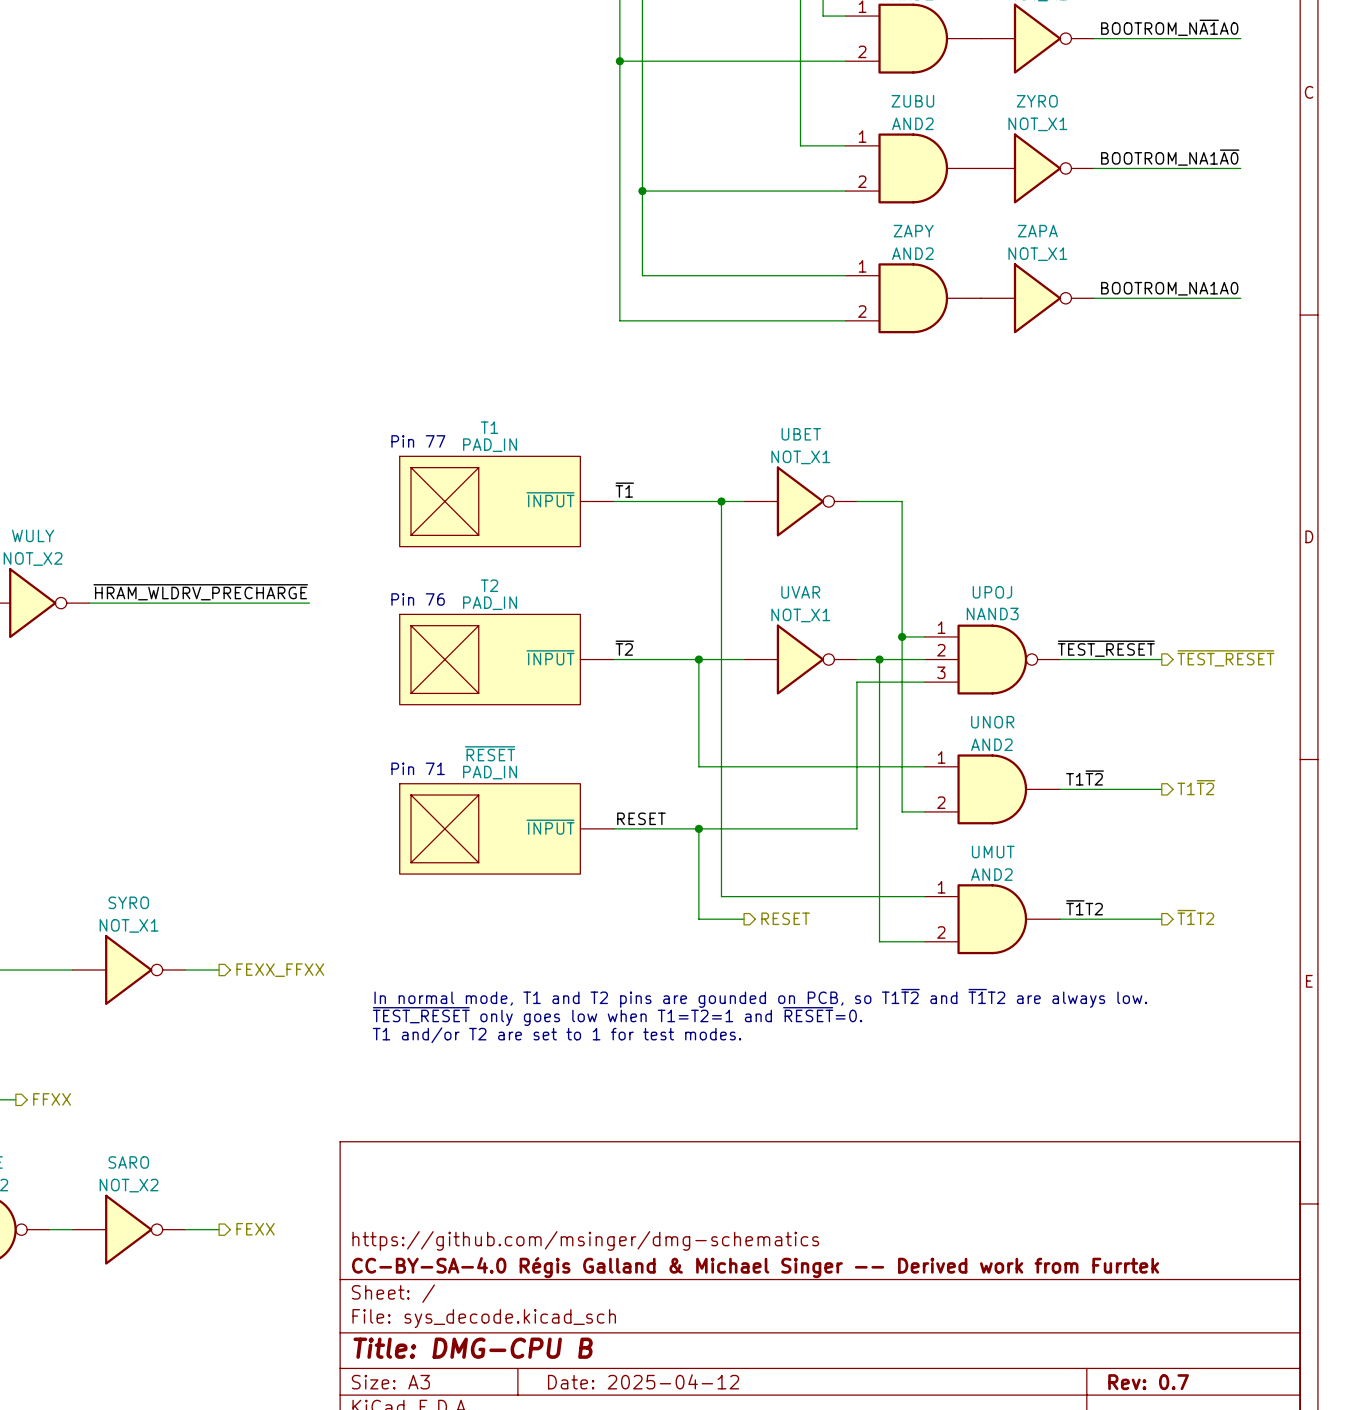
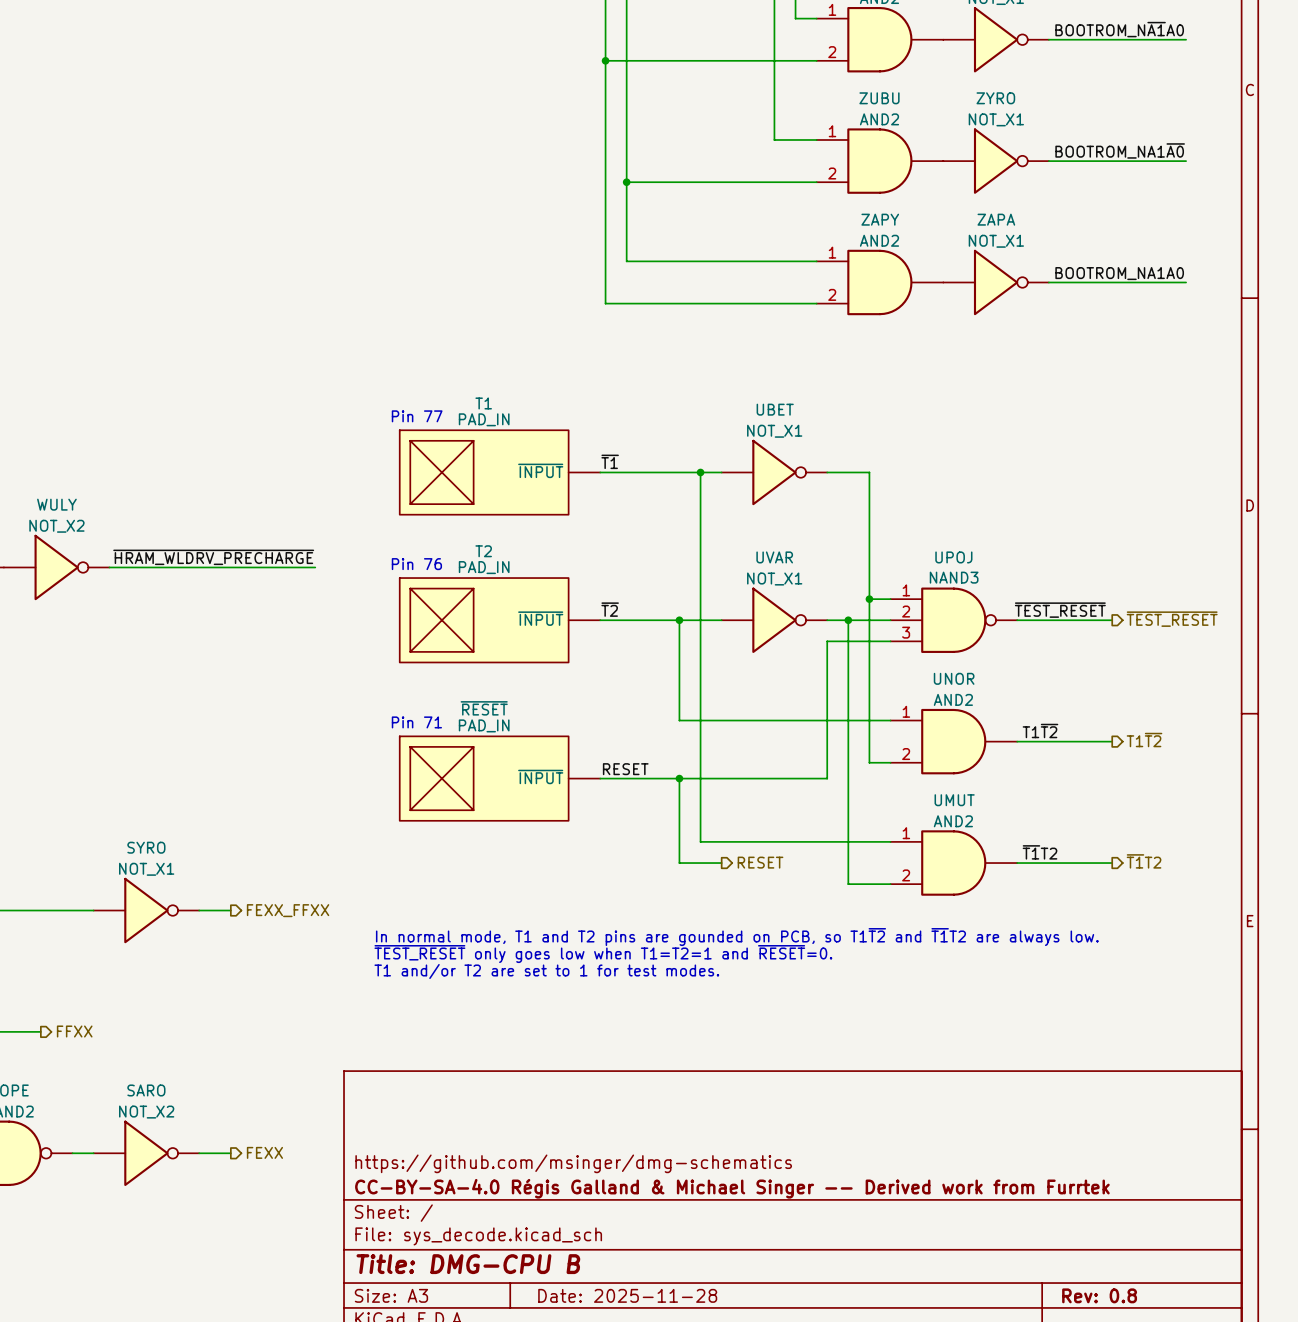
title block: Date: 2025-04-12 (643, 1381) -> Date: 2025-11-28 (627, 1295)
title block: Rev: 0.7 (1148, 1382) -> Rev: 0.8 (1099, 1295)

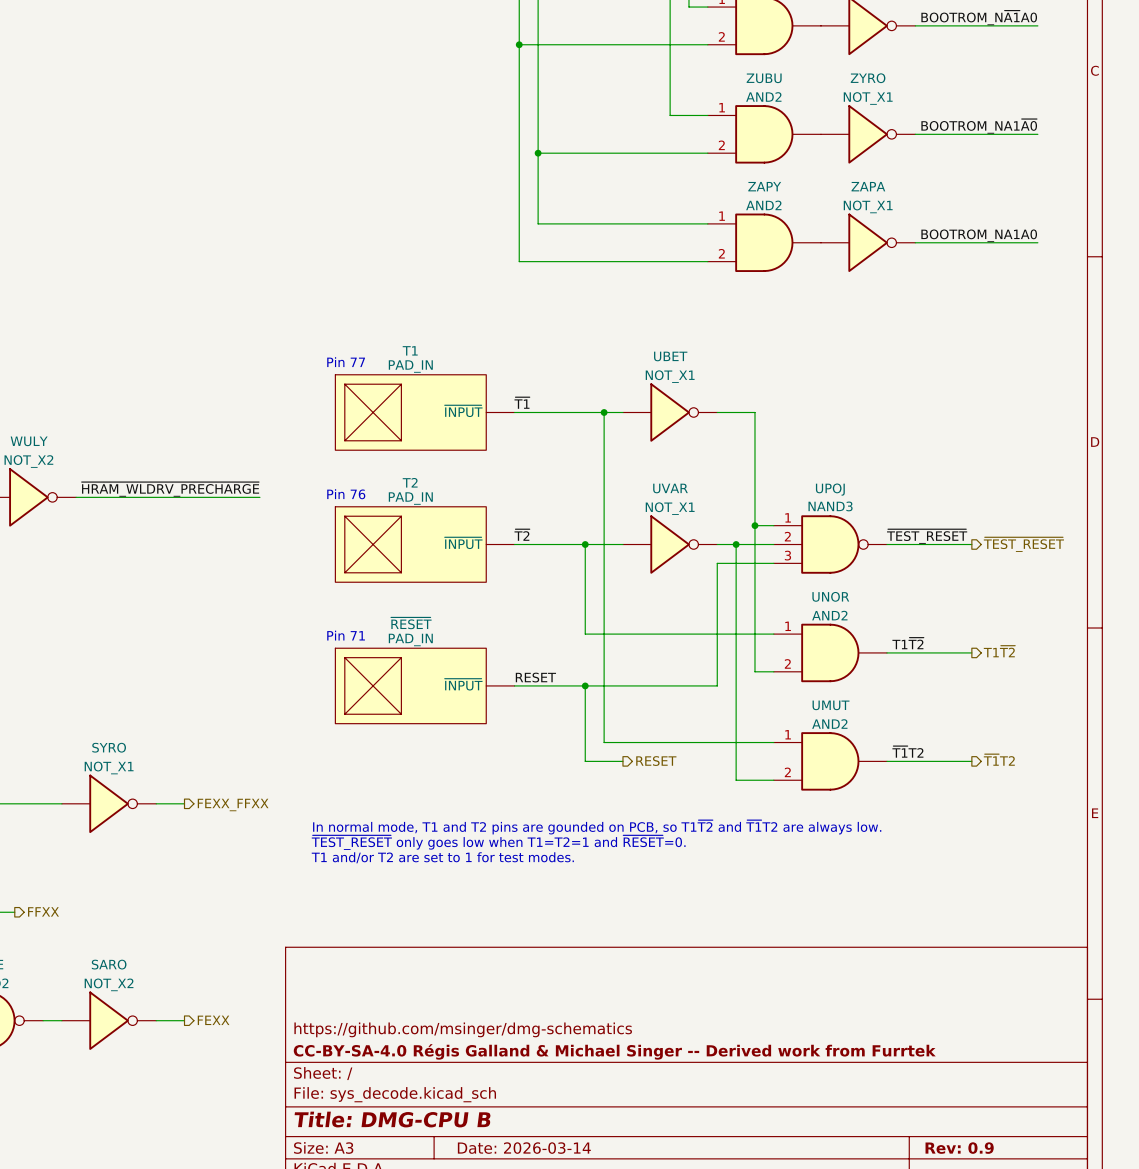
title block: Date: 2025-11-28 (627, 1295) -> Date: 2026-03-14 (524, 1148)
title block: Rev: 0.8 (1099, 1295) -> Rev: 0.9 (959, 1148)

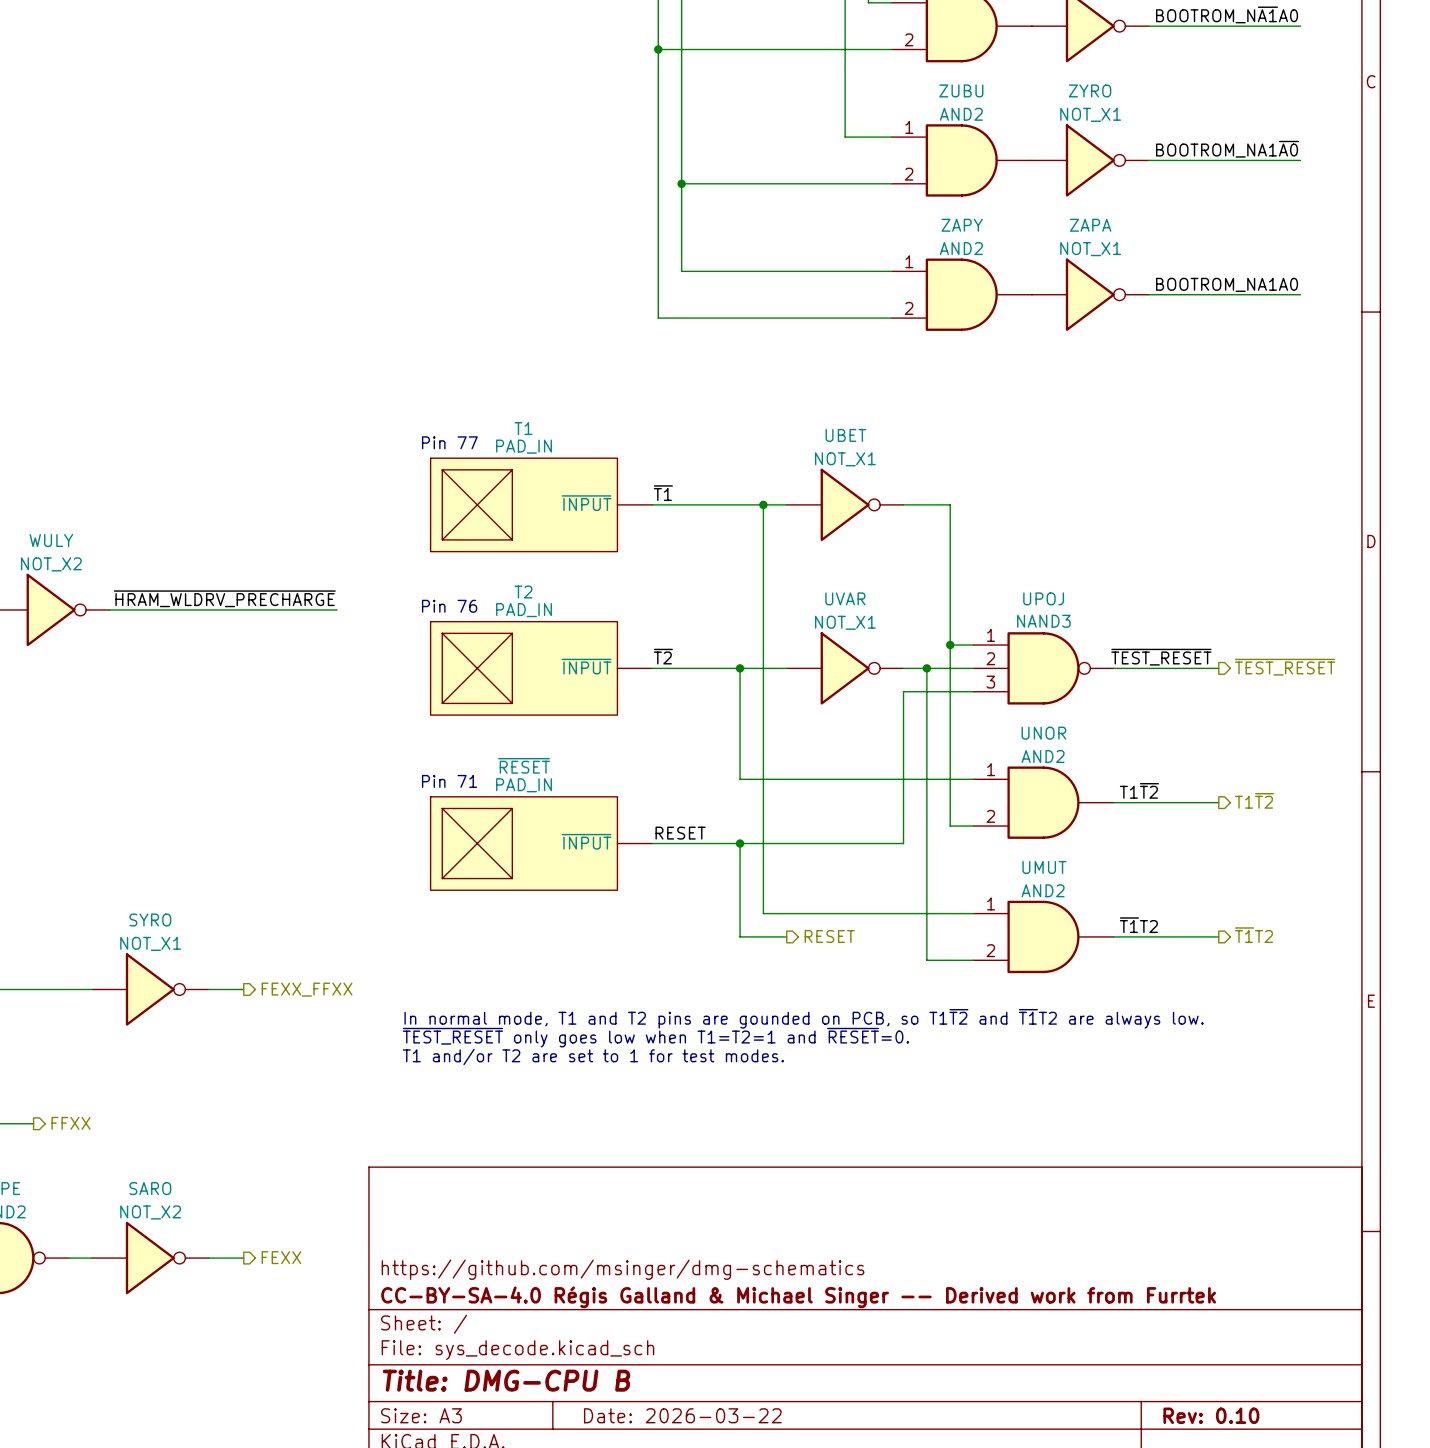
title block: Date: 2026-03-14 (524, 1148) -> Date: 2026-03-22 (682, 1415)
title block: Rev: 0.9 (959, 1148) -> Rev: 0.10 (1211, 1415)

